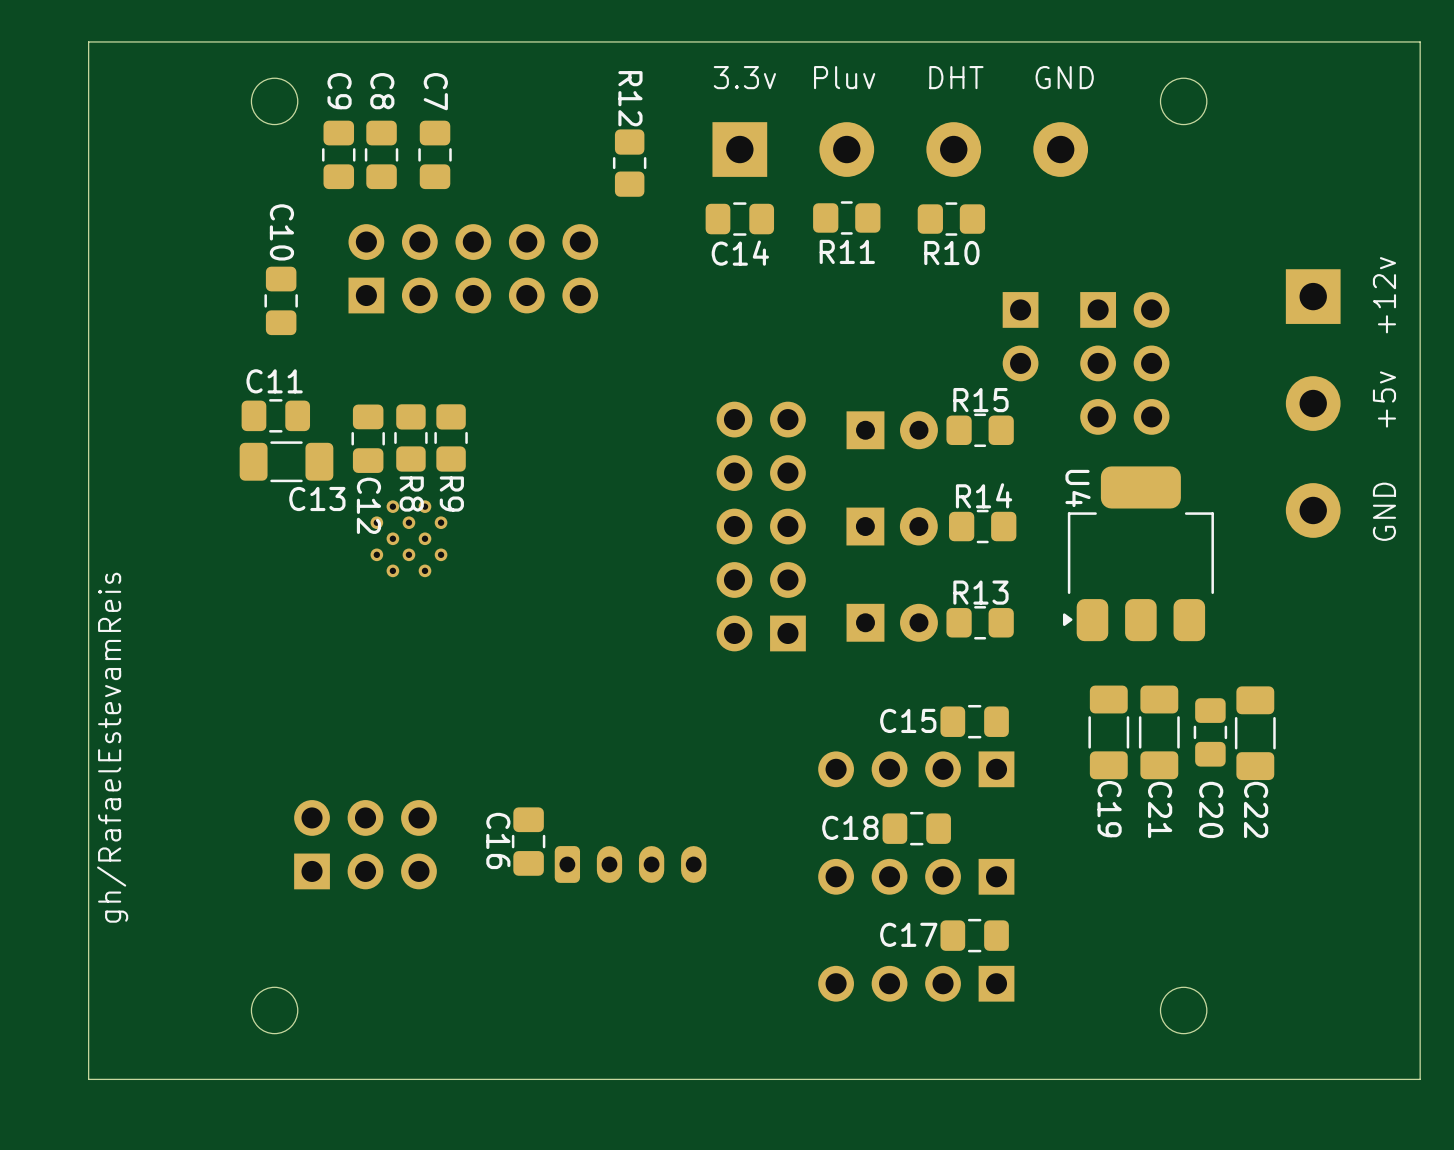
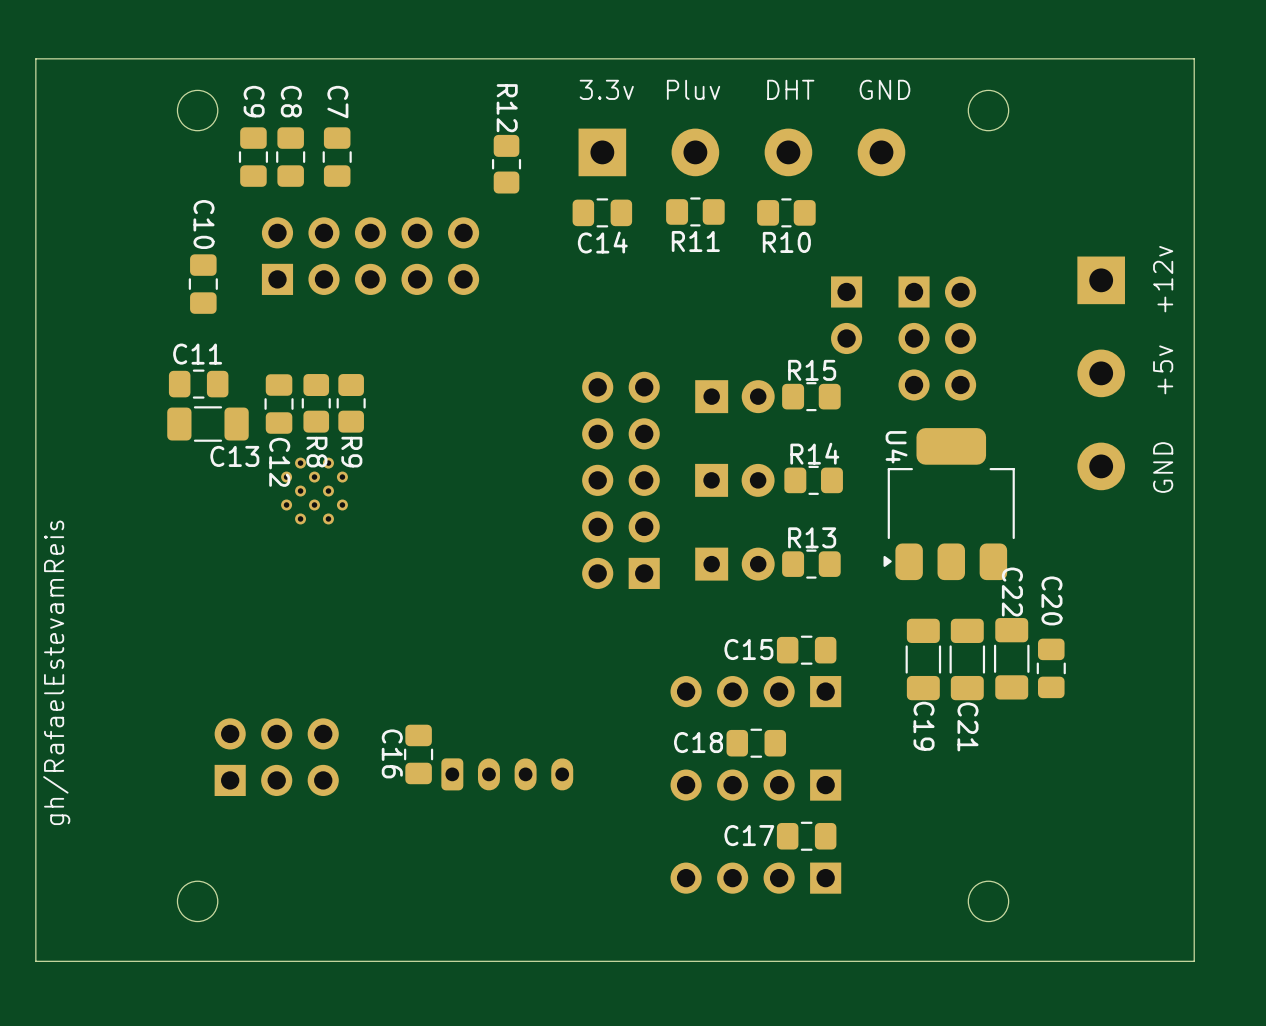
C20 position: (1210, 732) -> (1051, 668)
C22 position: (1255, 733) -> (1011, 658)
C20 name position: C20 (1211, 809) -> C20 (1051, 600)
C22 name position: C22 (1256, 809) -> C22 (1012, 592)

